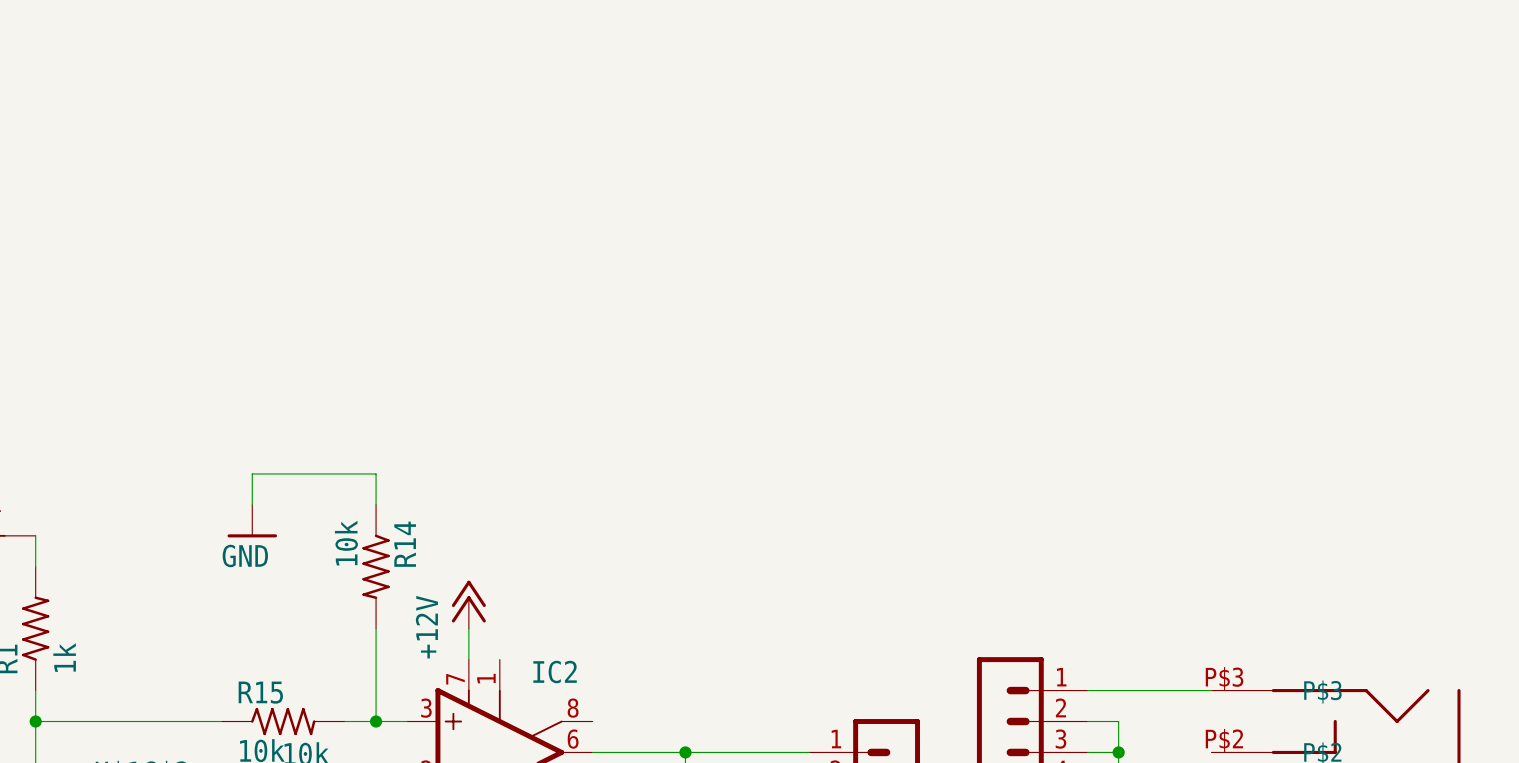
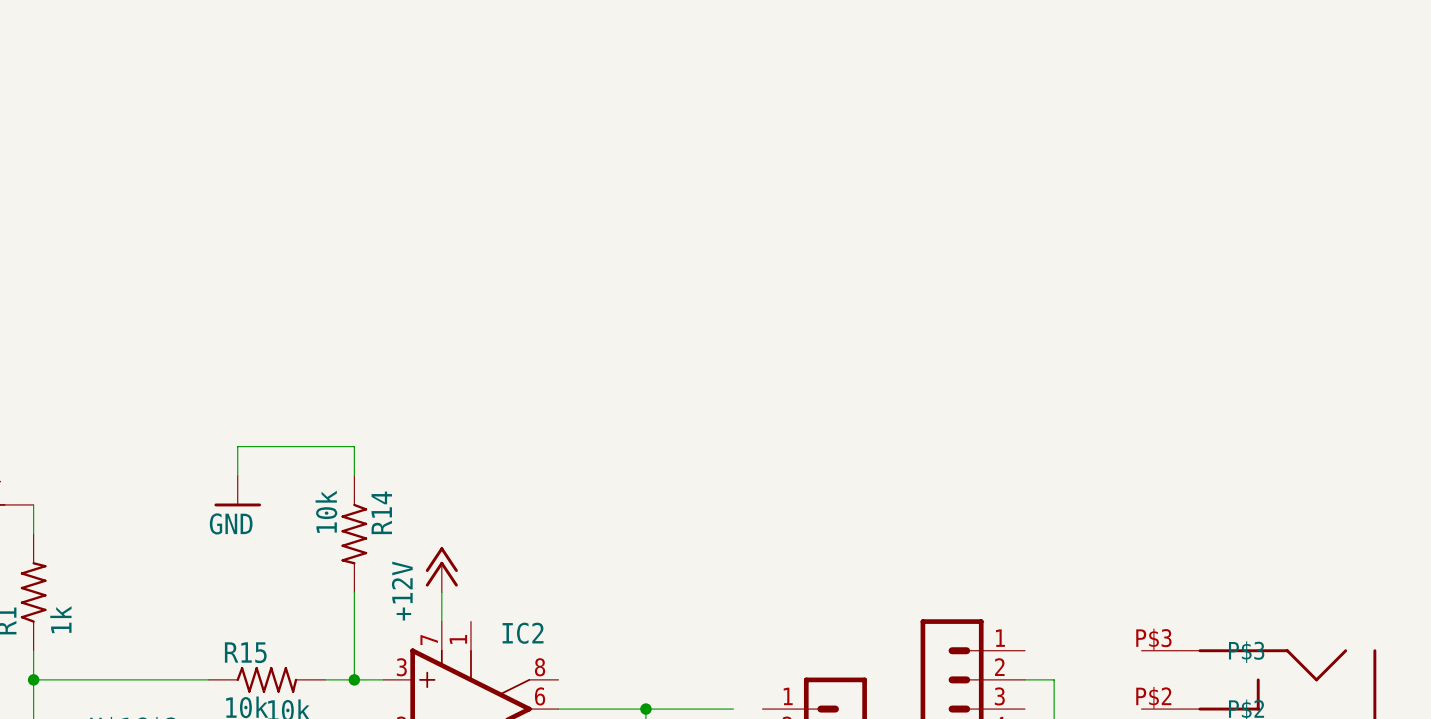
wire: (1087, 690) (1211, 690) -> none
wire: (778, 752) (809, 752) -> none
wire: (1087, 752) (1118, 752) -> none
junction: (1118, 752) -> none

